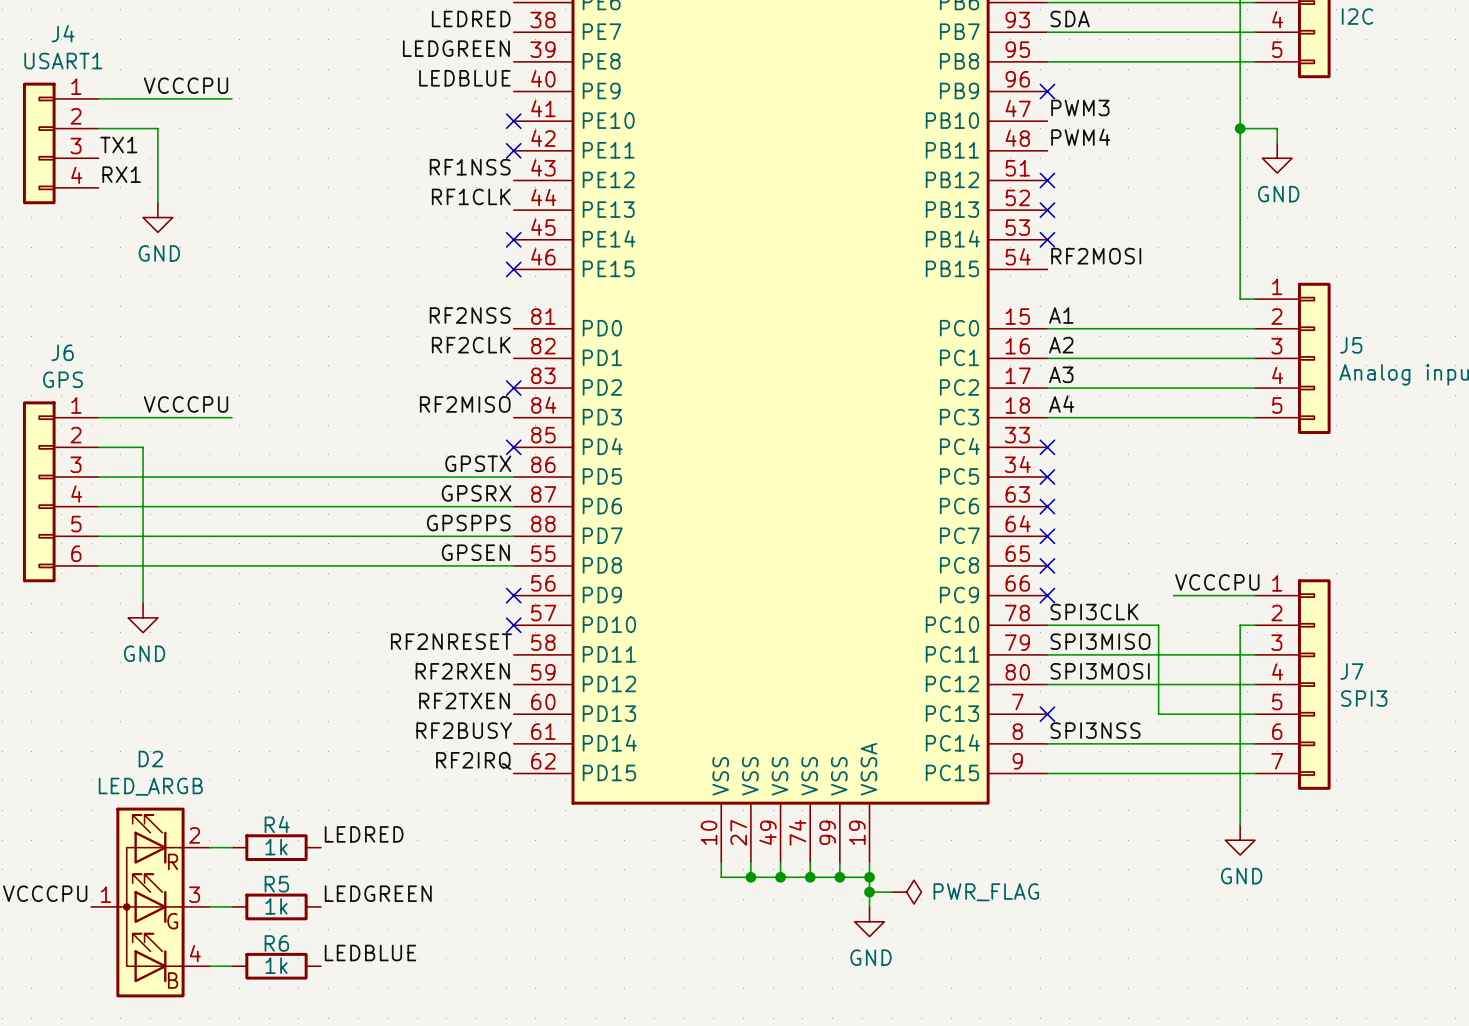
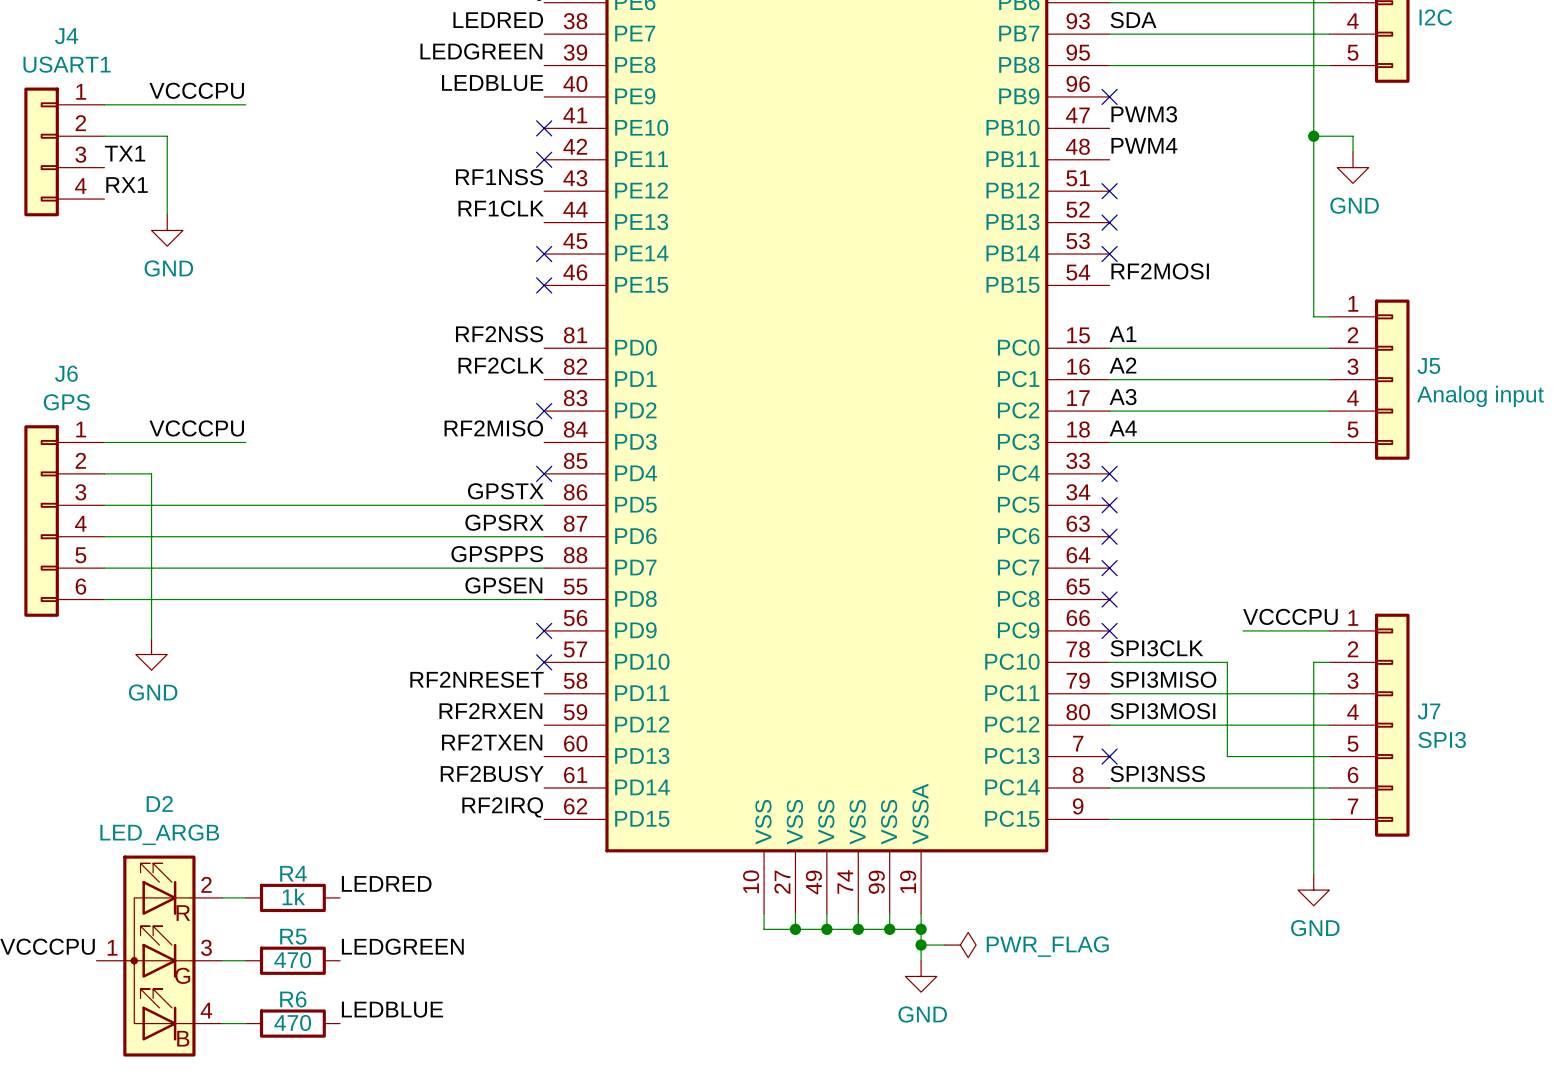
R5 value: 1k (276, 906) -> 470 (292, 960)
R6 value: 1k (276, 965) -> 470 (292, 1022)

